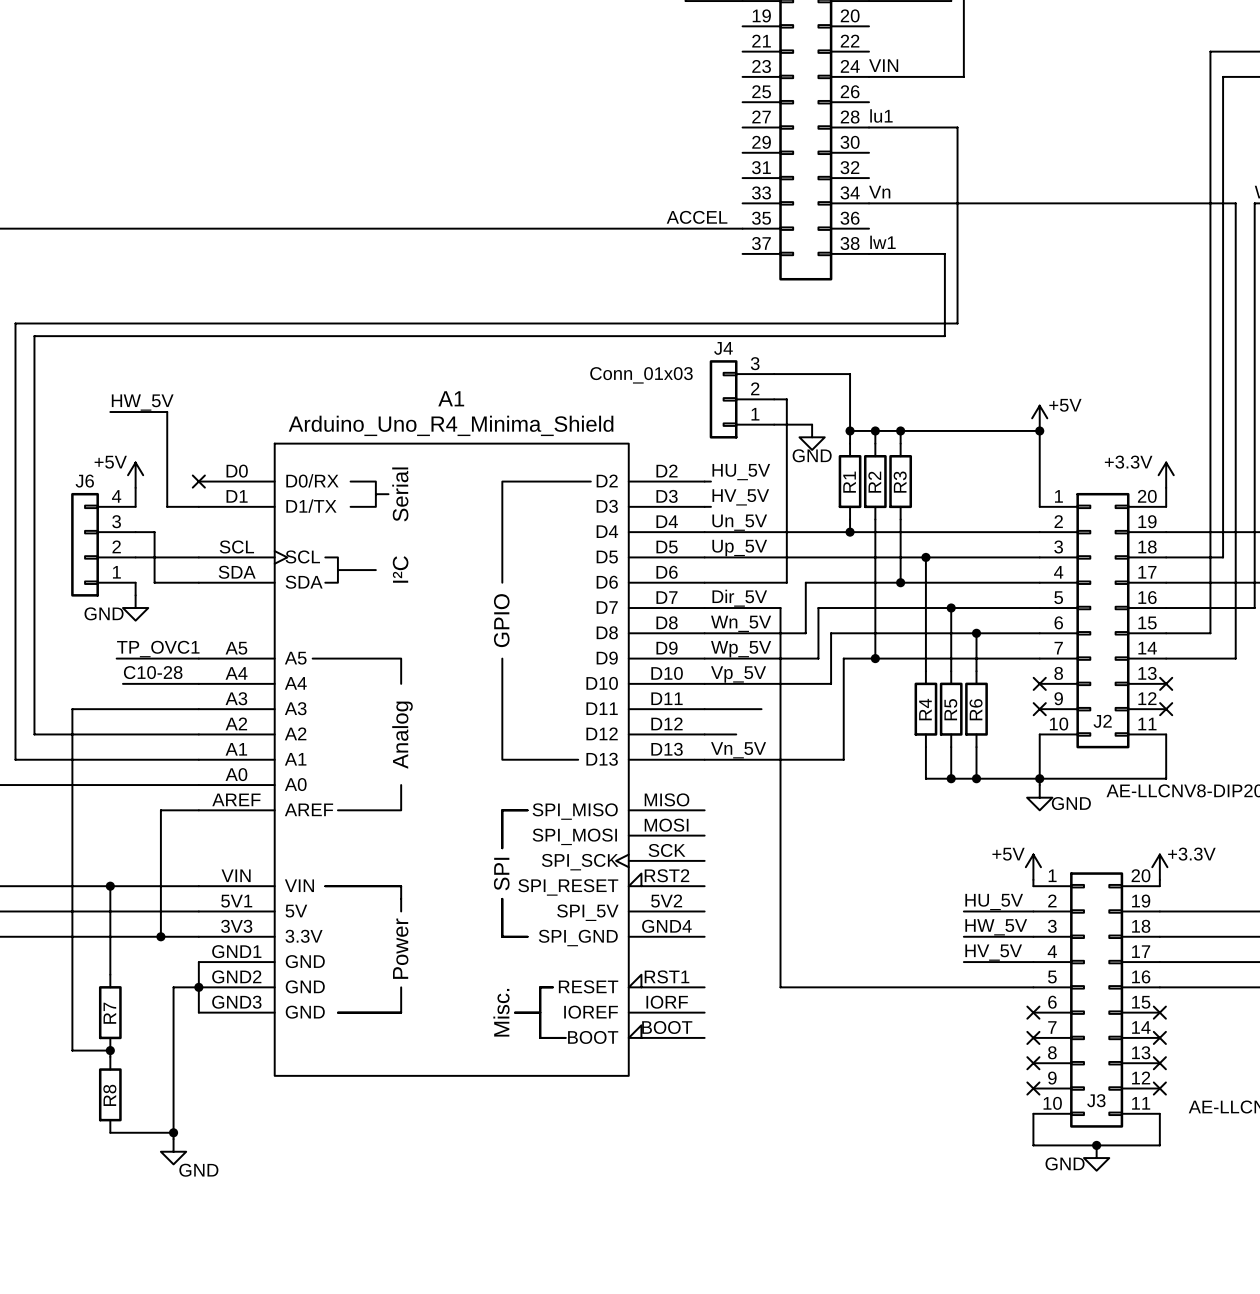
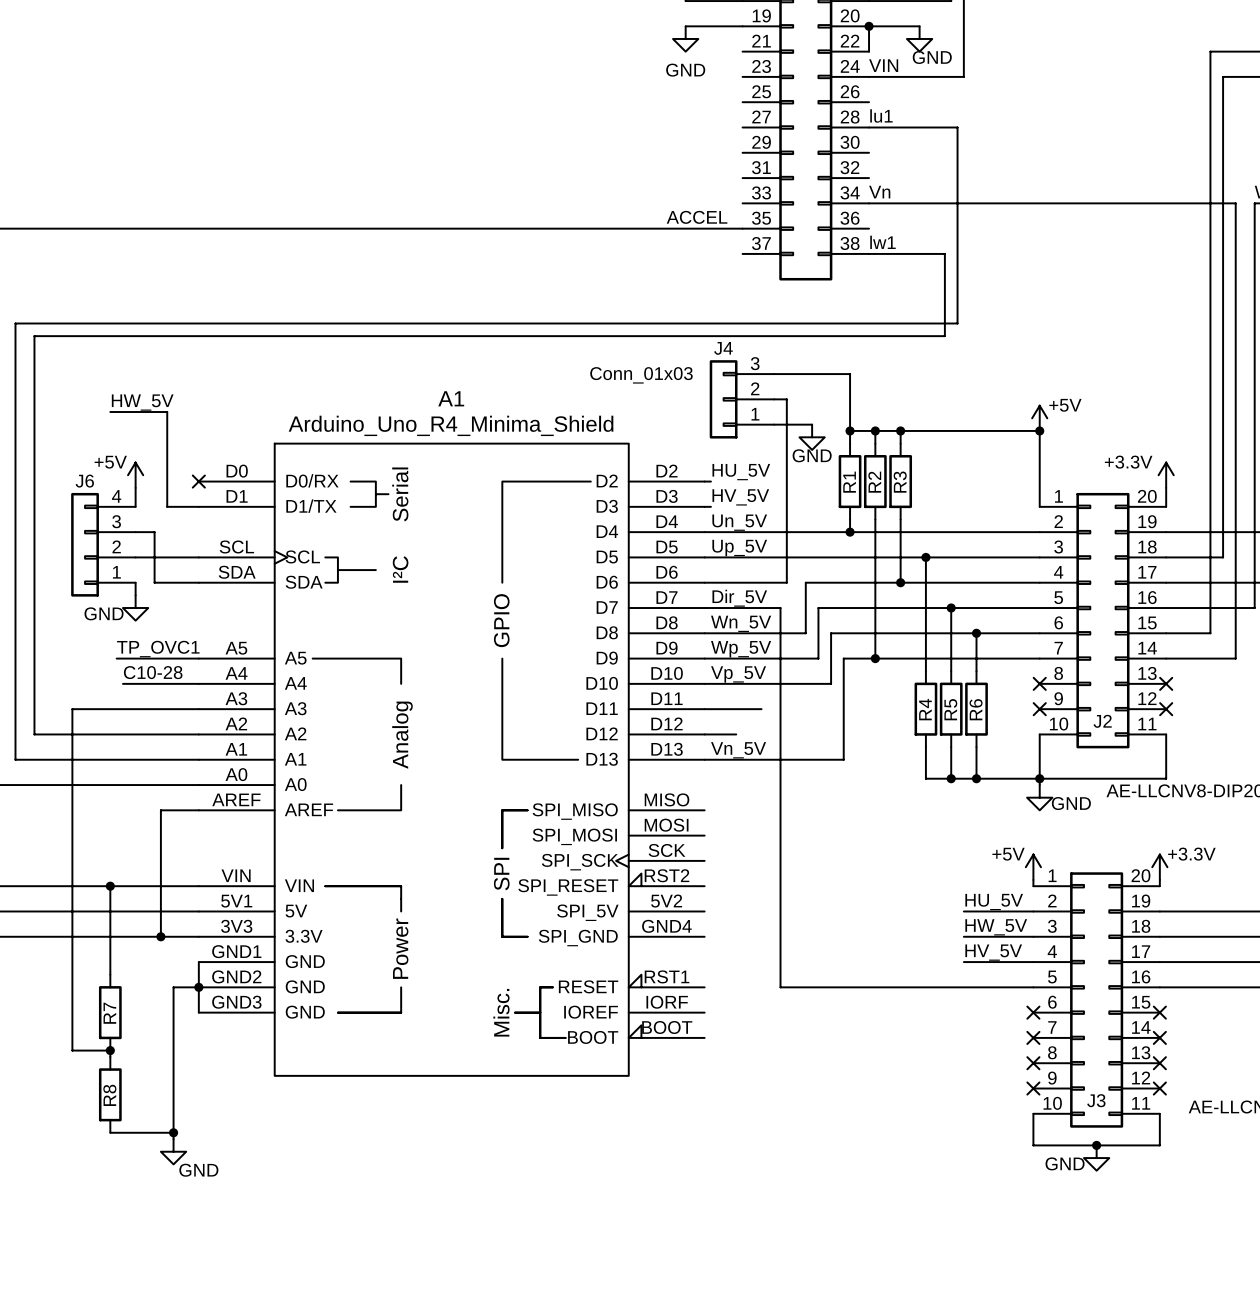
wire: none -> (685, 26) (742, 26)
junction: none -> (869, 26)
wire: none -> (919, 26) (869, 26) (869, 51)
power symbol: none -> GND (685, 38)
power symbol: none -> GND (919, 38)

